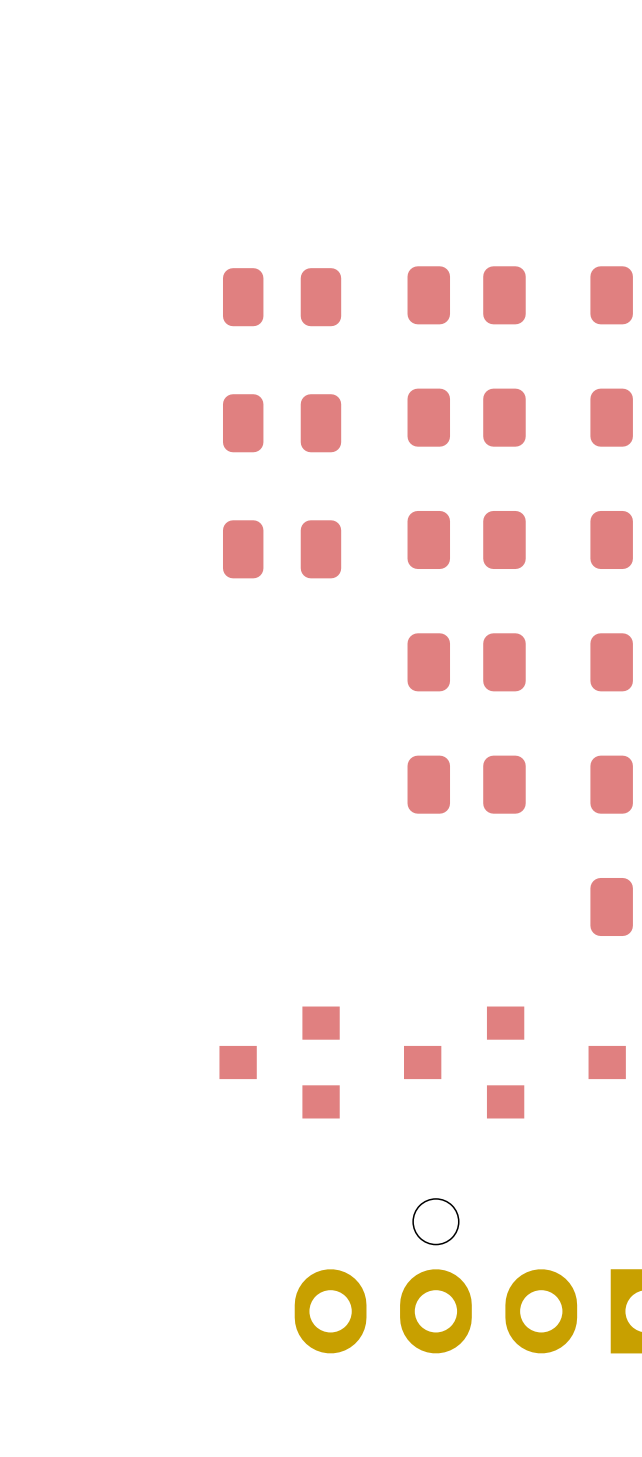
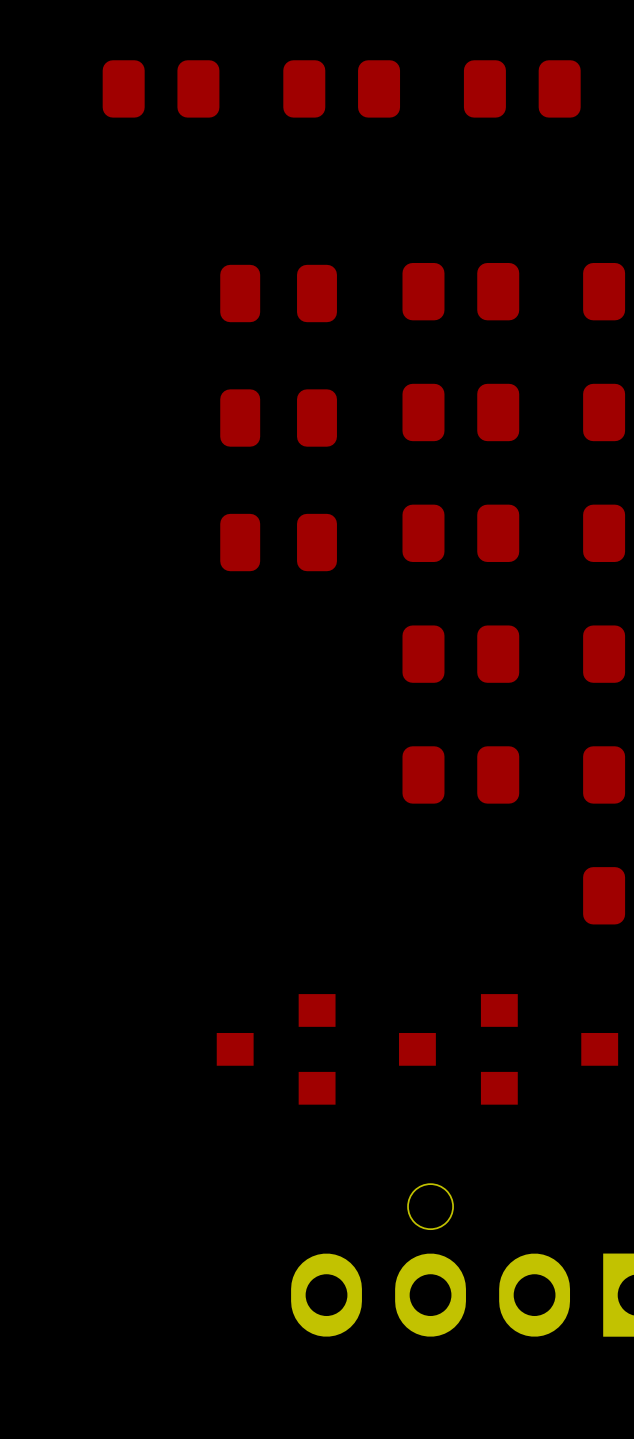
part: none -> (161, 88)
part: none -> (341, 88)
part: none -> (522, 88)

